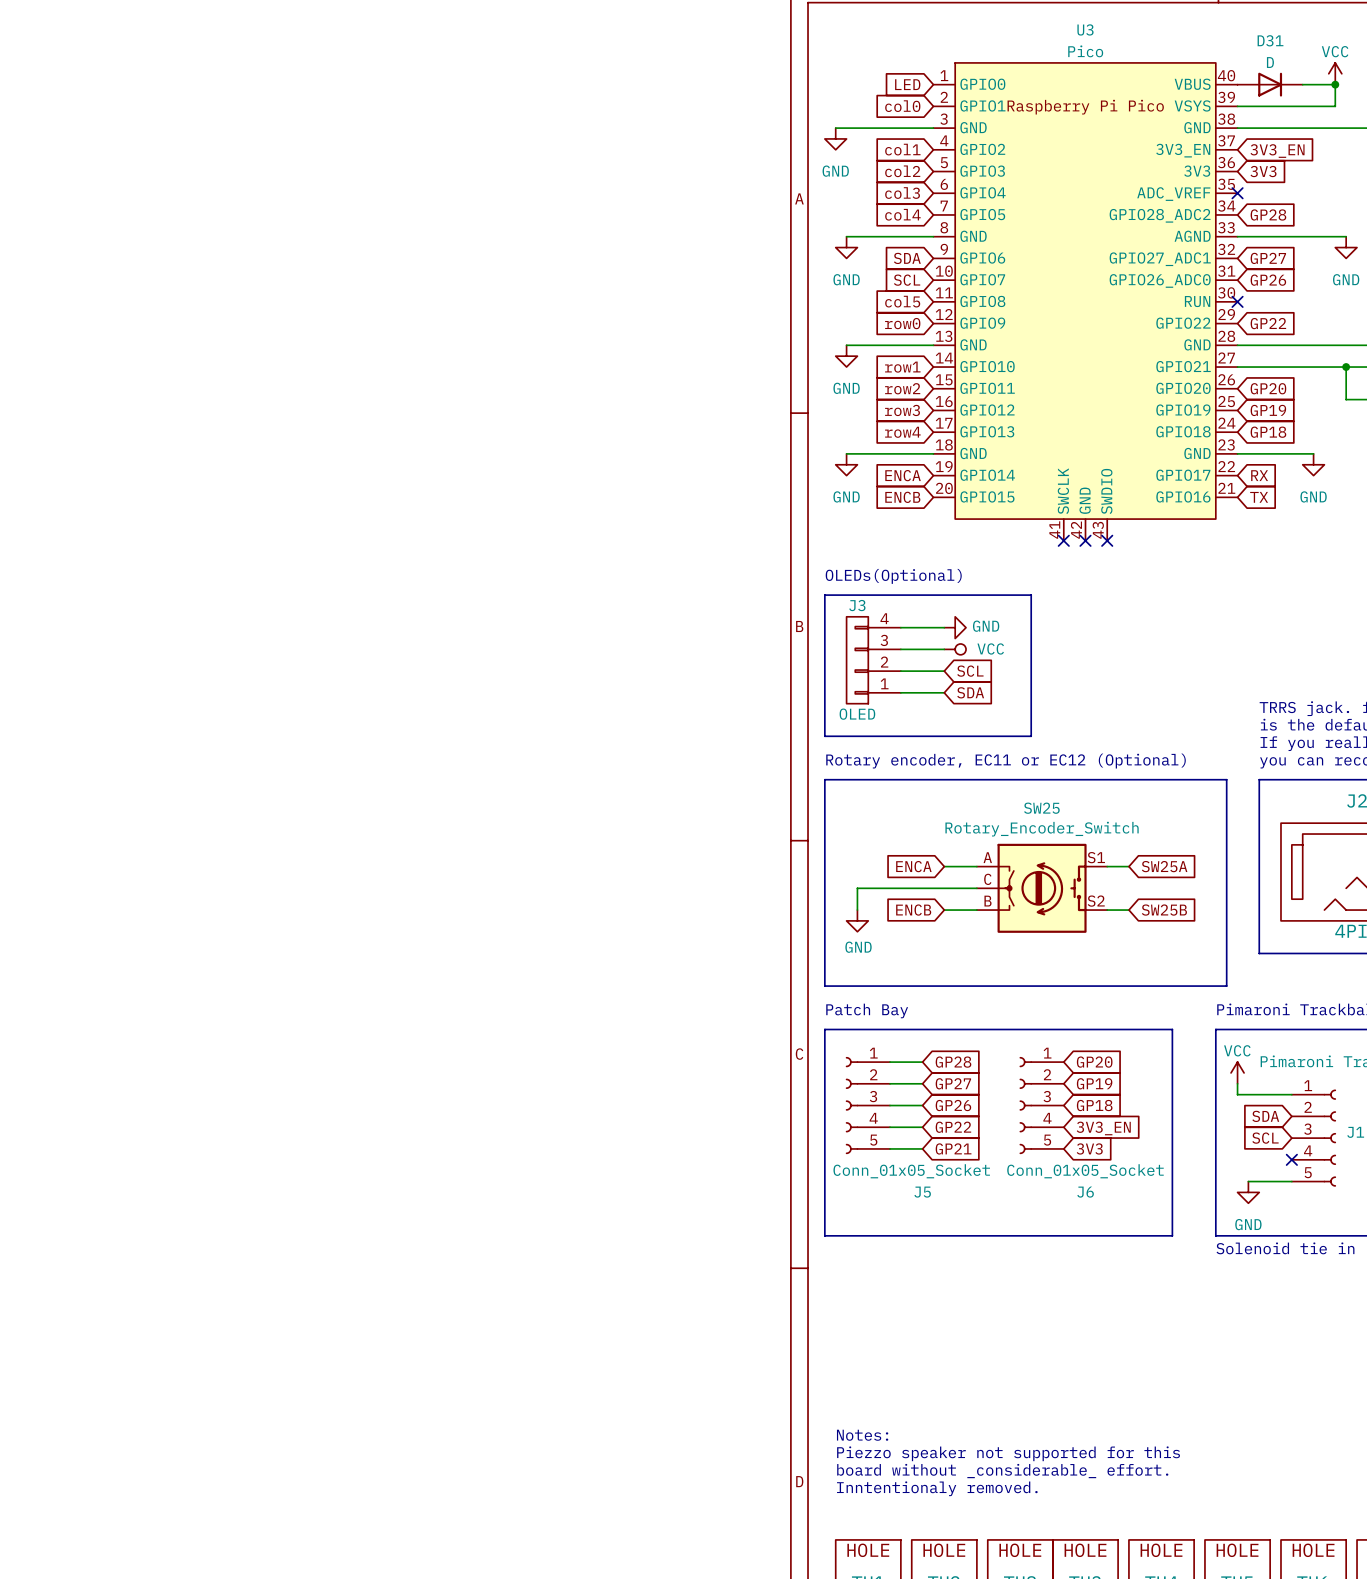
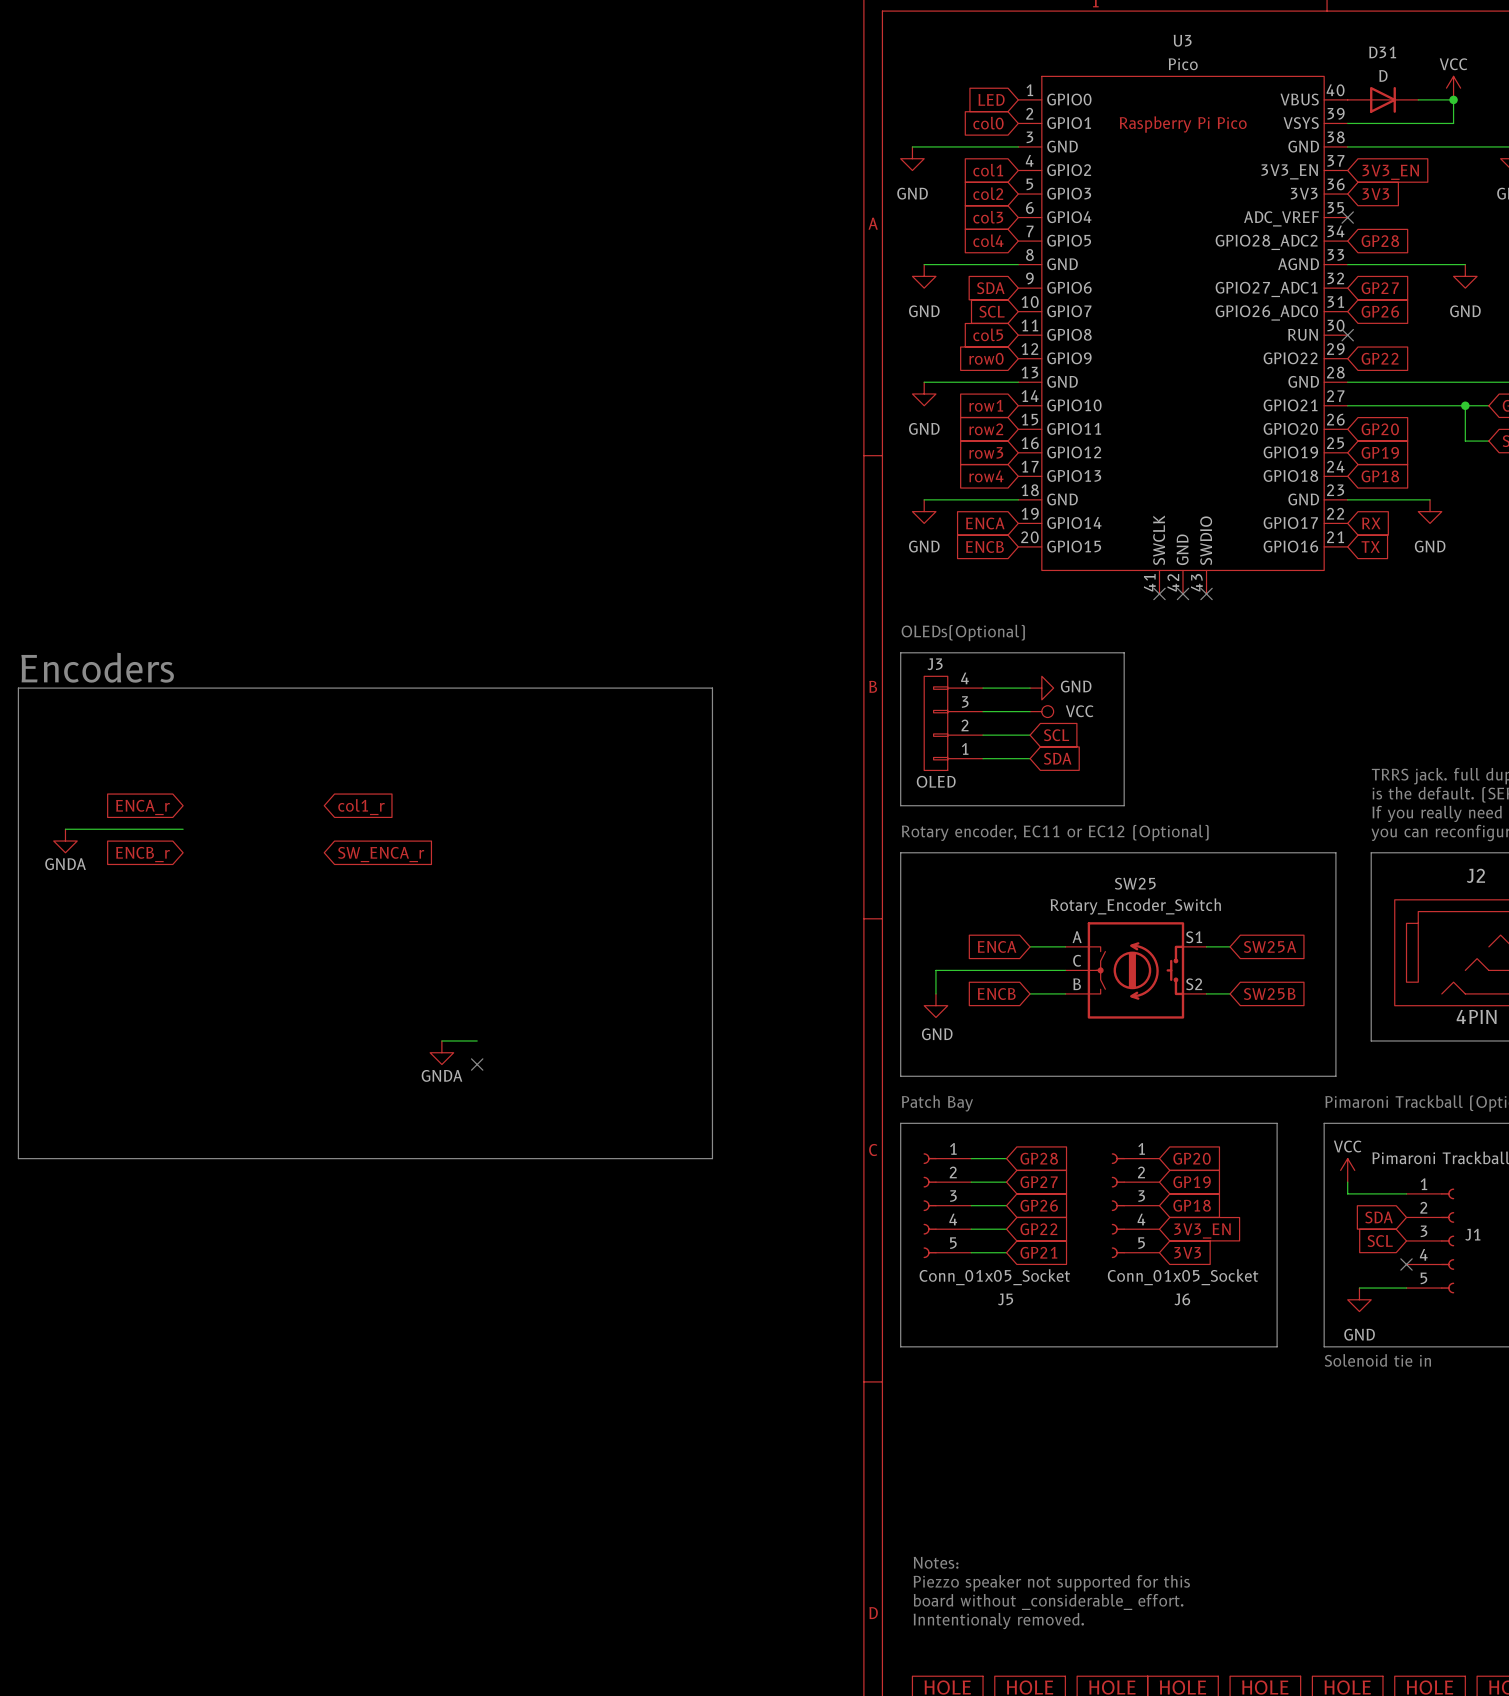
text: none -> Encoders (97, 667)
line: none -> (18, 688) (712, 688) (712, 1158) (18, 1158) (18, 688)
global label: none -> ENCA_r (143, 807)
global label: none -> col1_r (361, 807)
wire: none -> (65, 829) (183, 829)
power symbol: none -> GNDA (65, 841)
global label: none -> ENCB_r (143, 854)
global label: none -> SW_ENCA_r (381, 854)
wire: none -> (441, 1040) (477, 1040)
power symbol: none -> GNDA (441, 1052)
no-connect mark: none -> (477, 1064)

